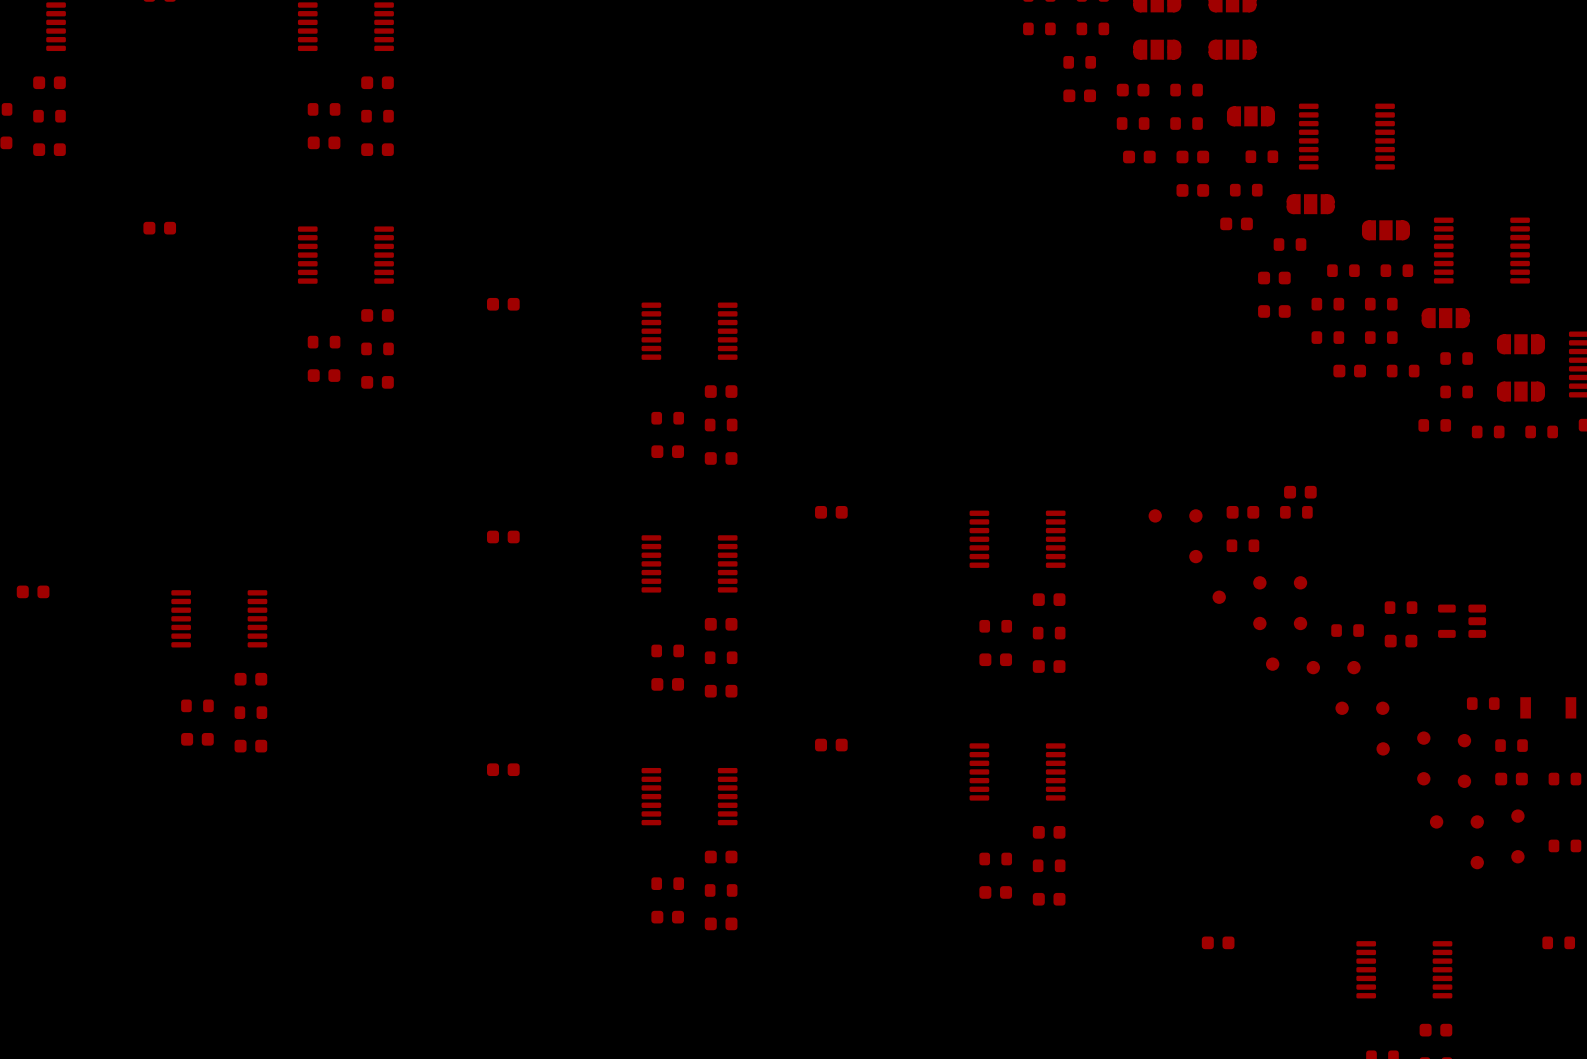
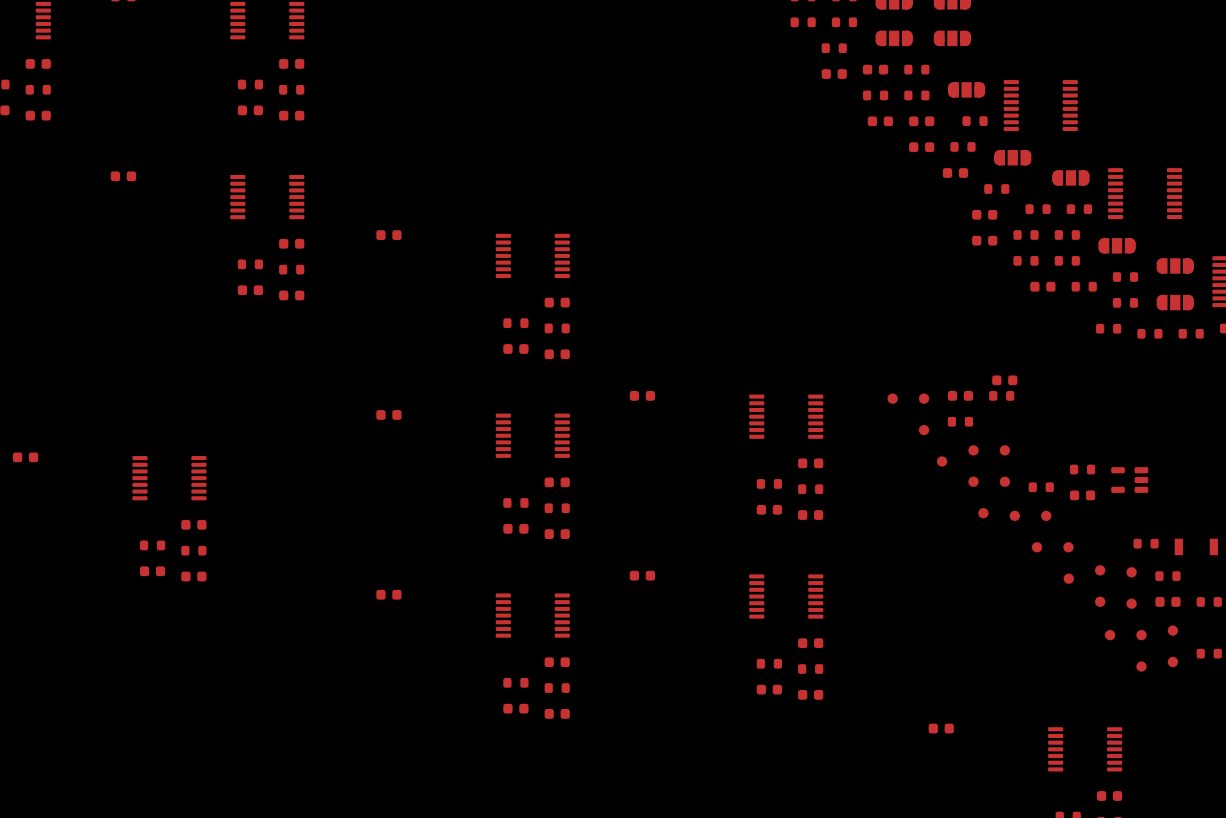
part: (1558, 942) -> none

